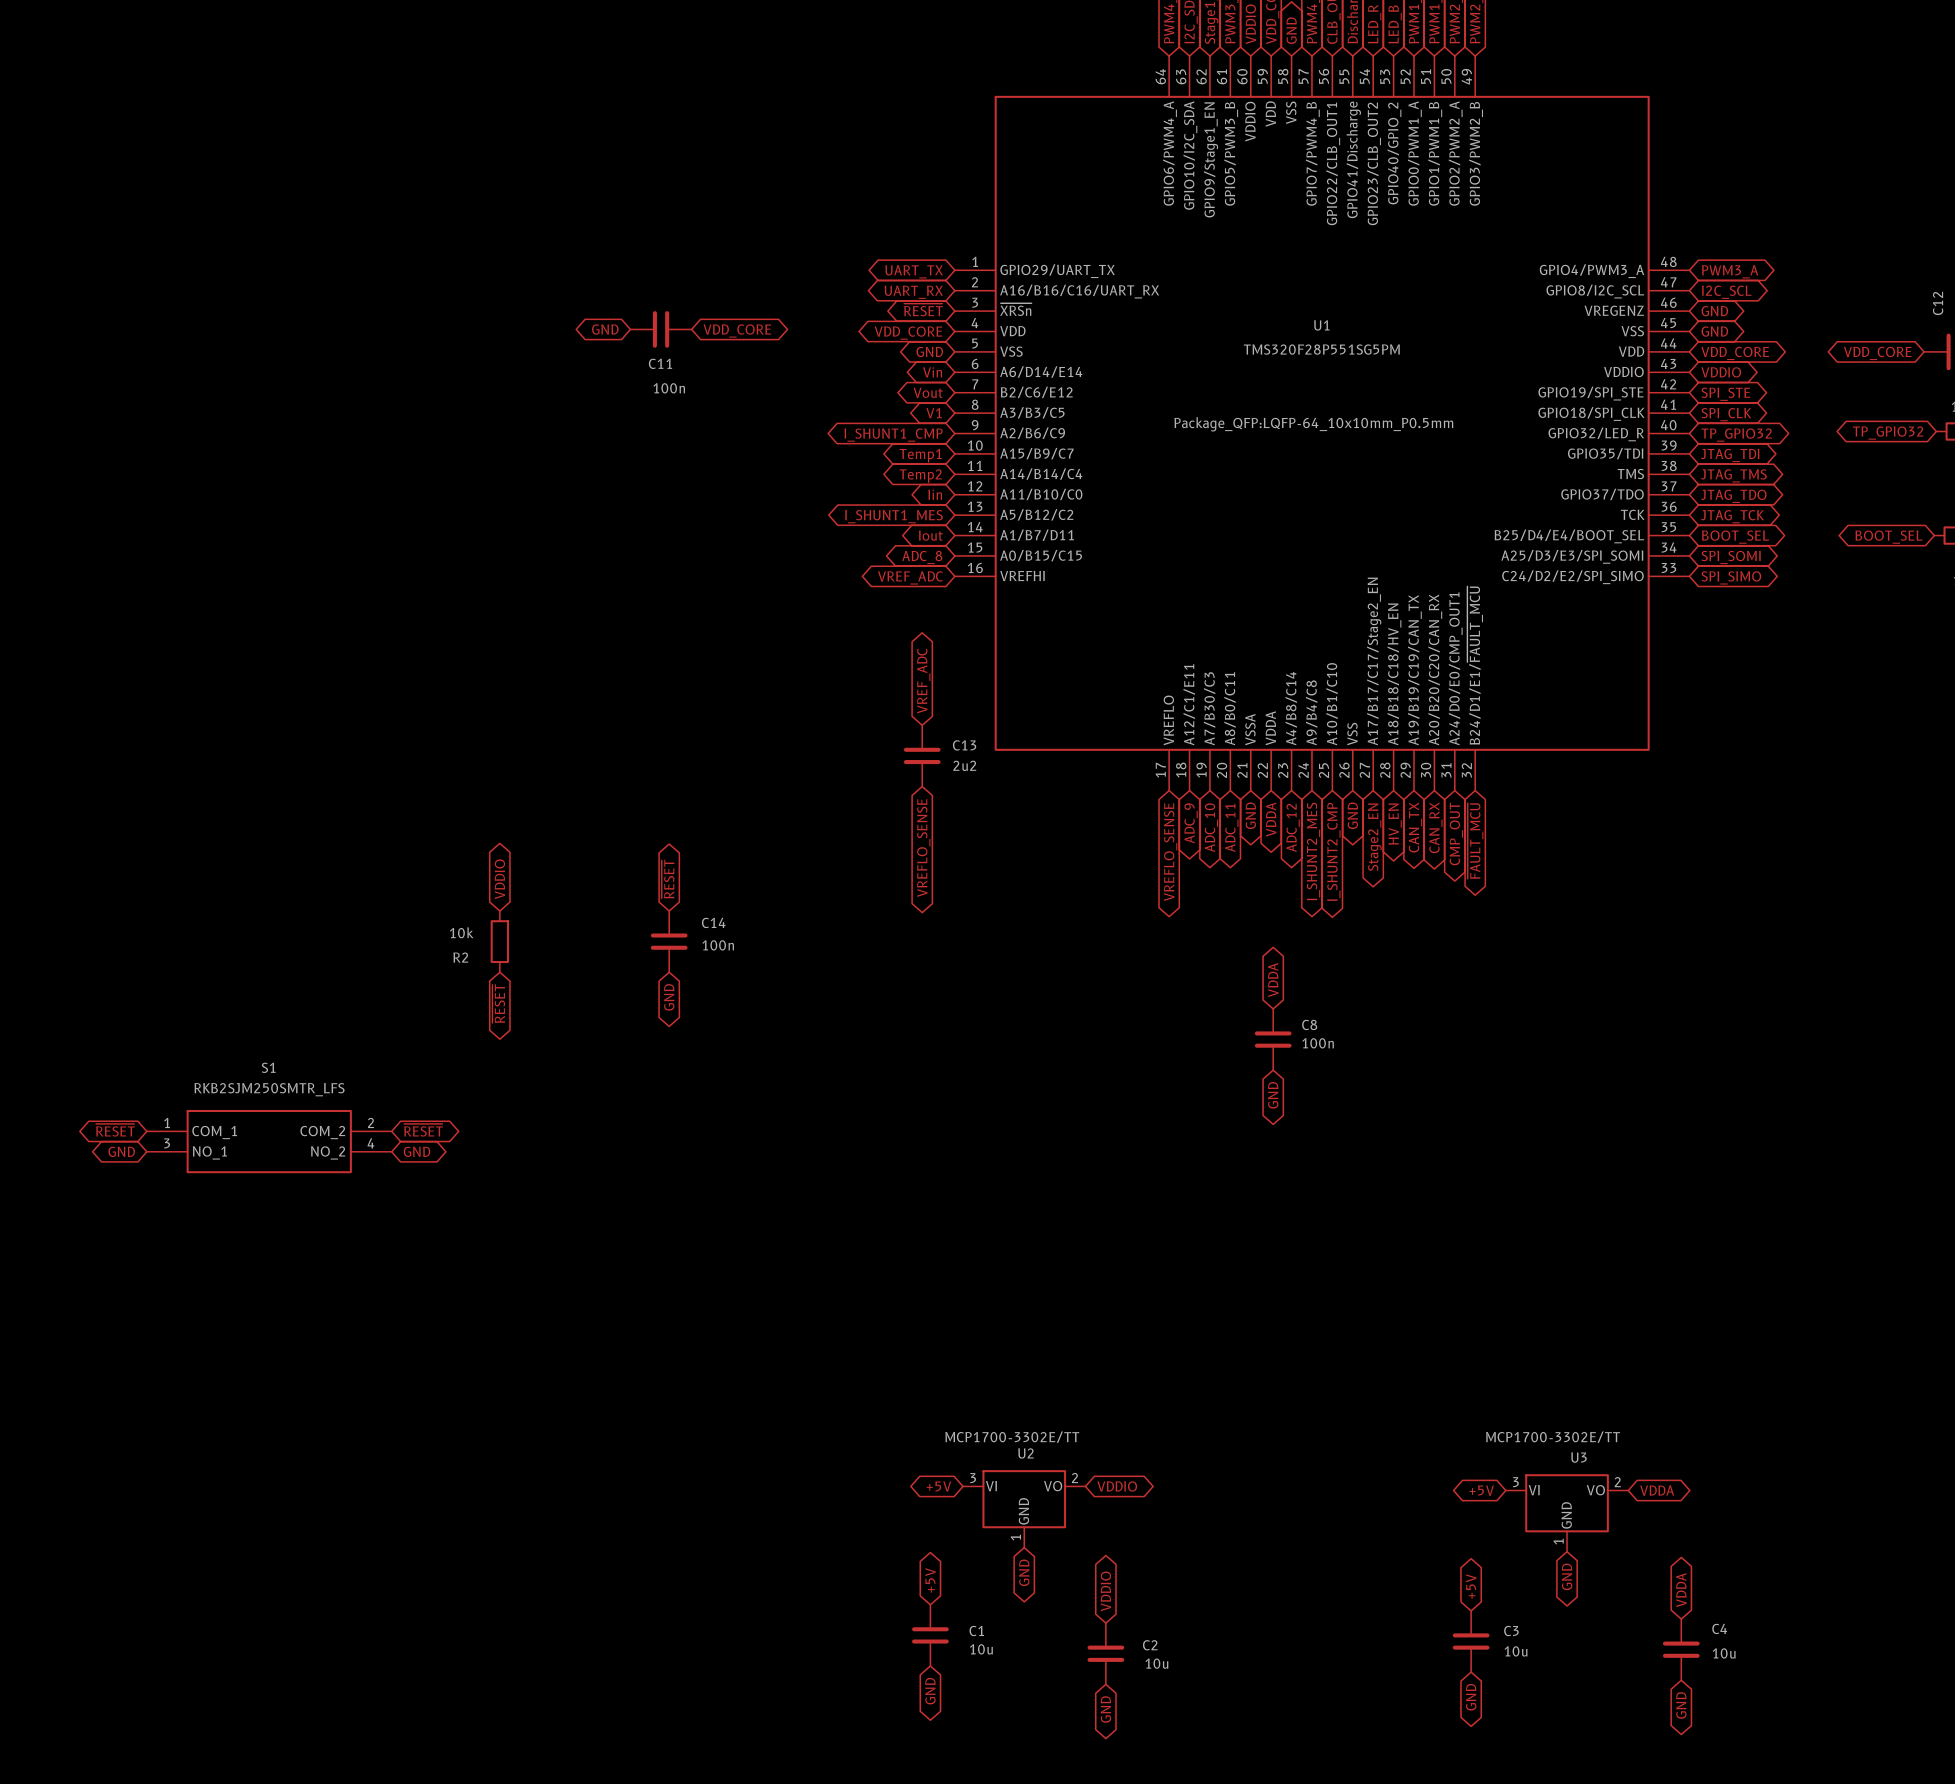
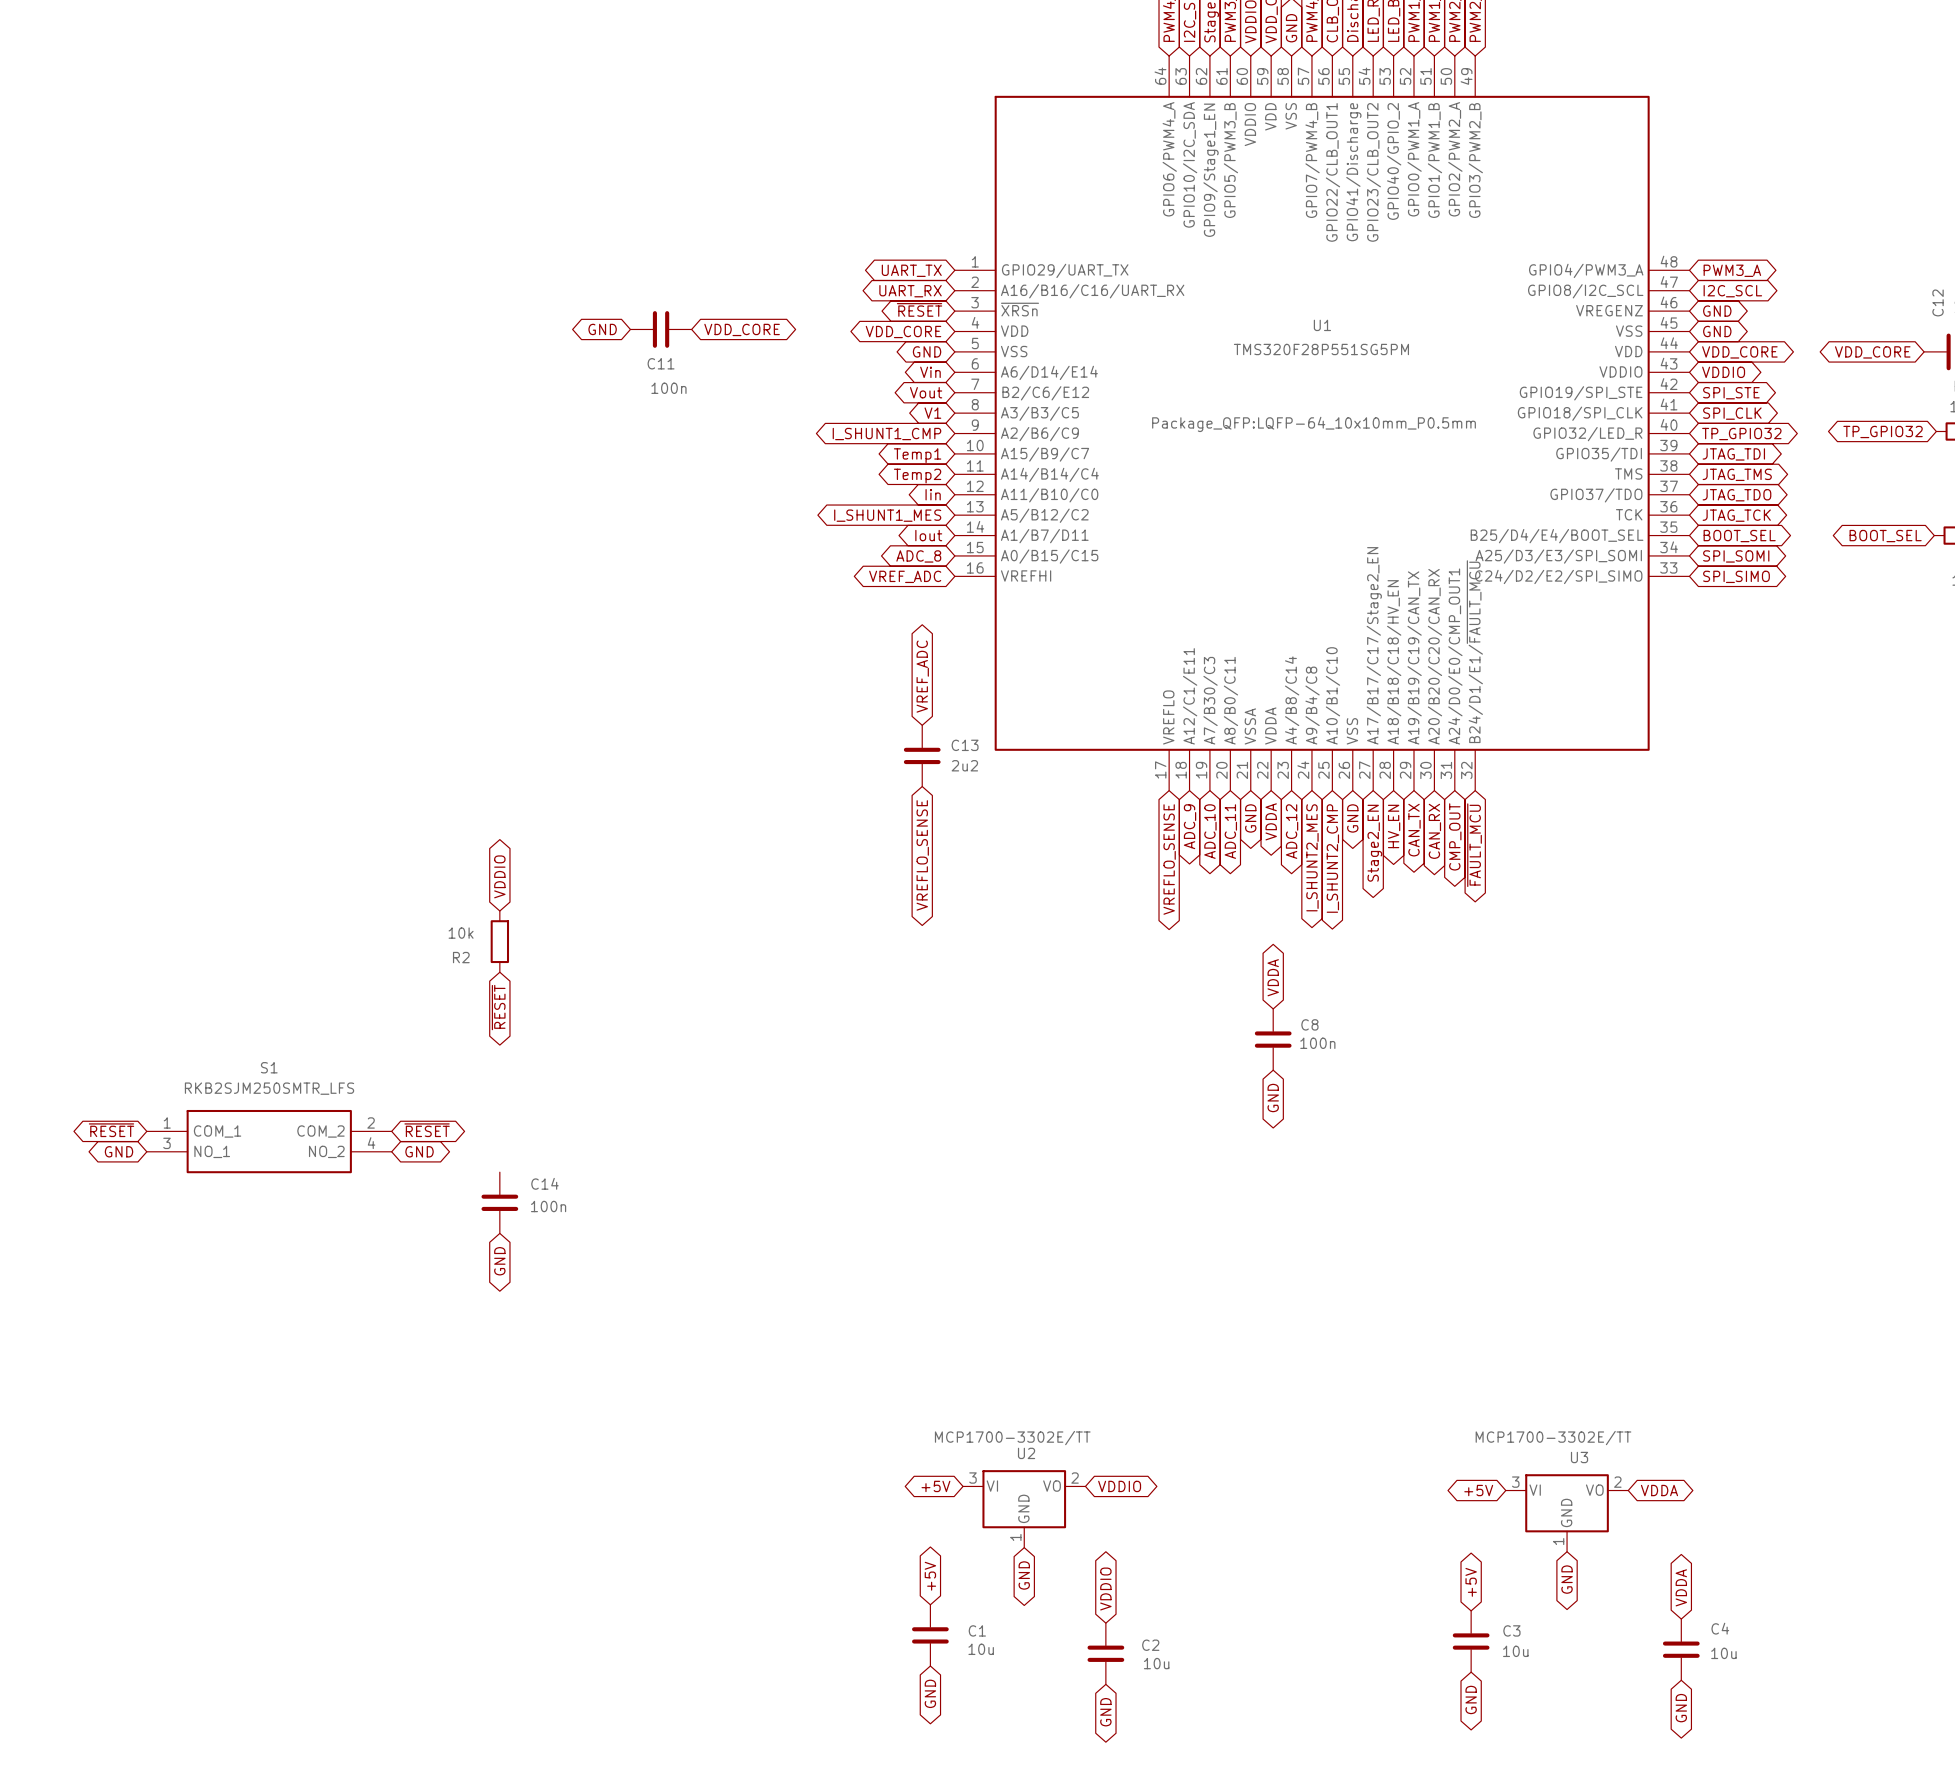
global label: ~{RESET} (668, 879) -> none
C14 position: (669, 941) -> (499, 1202)
global label: GND (669, 997) -> none
global label: none -> GND (499, 1261)

